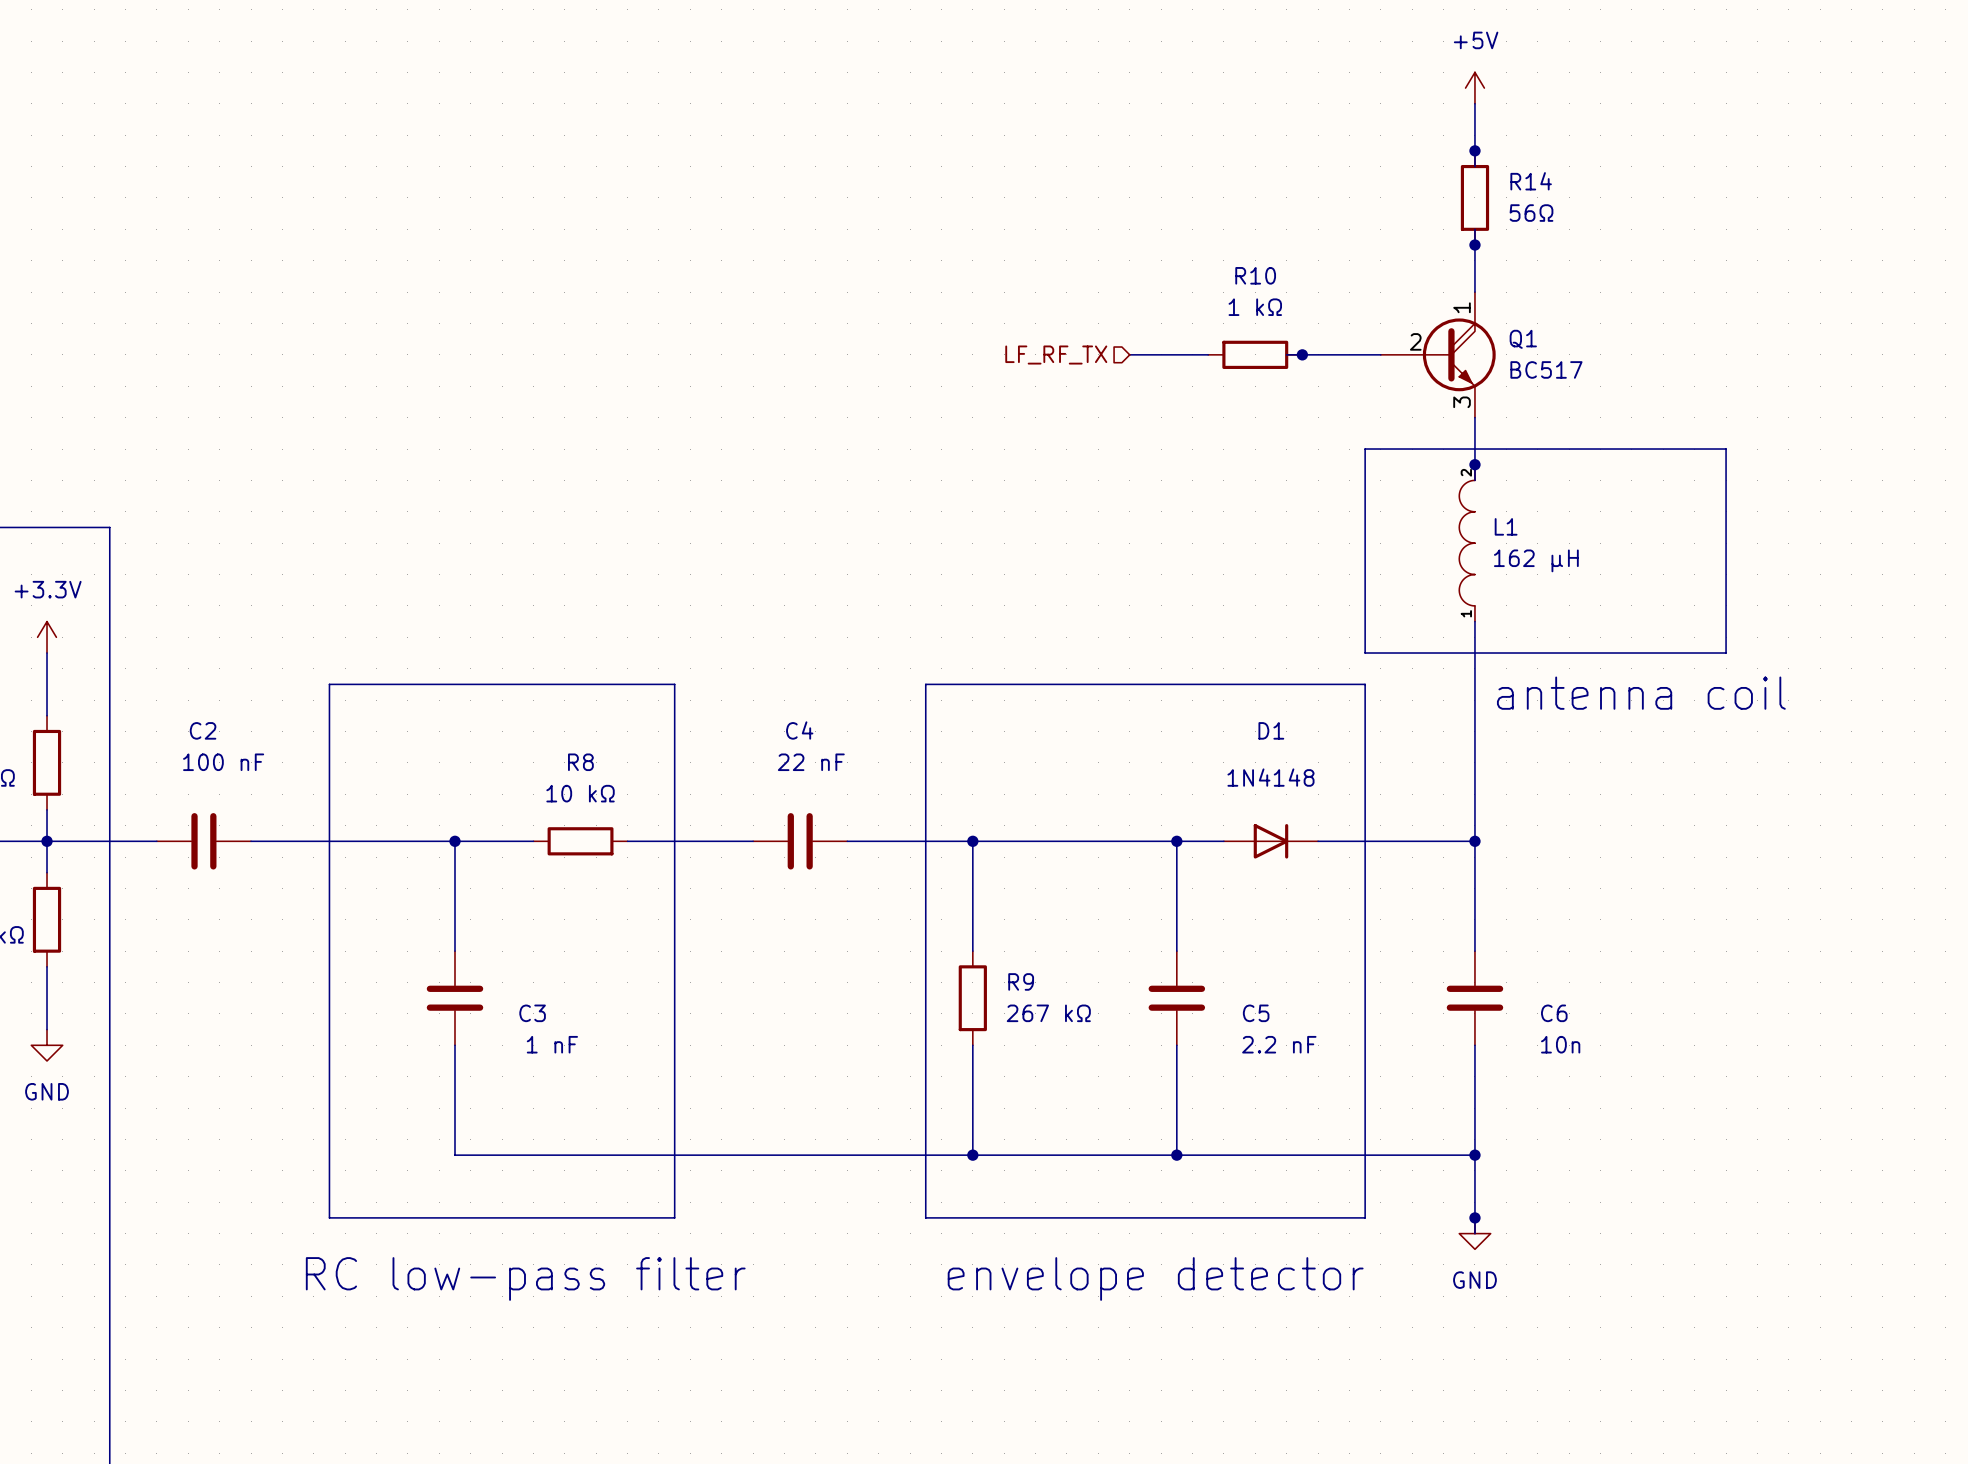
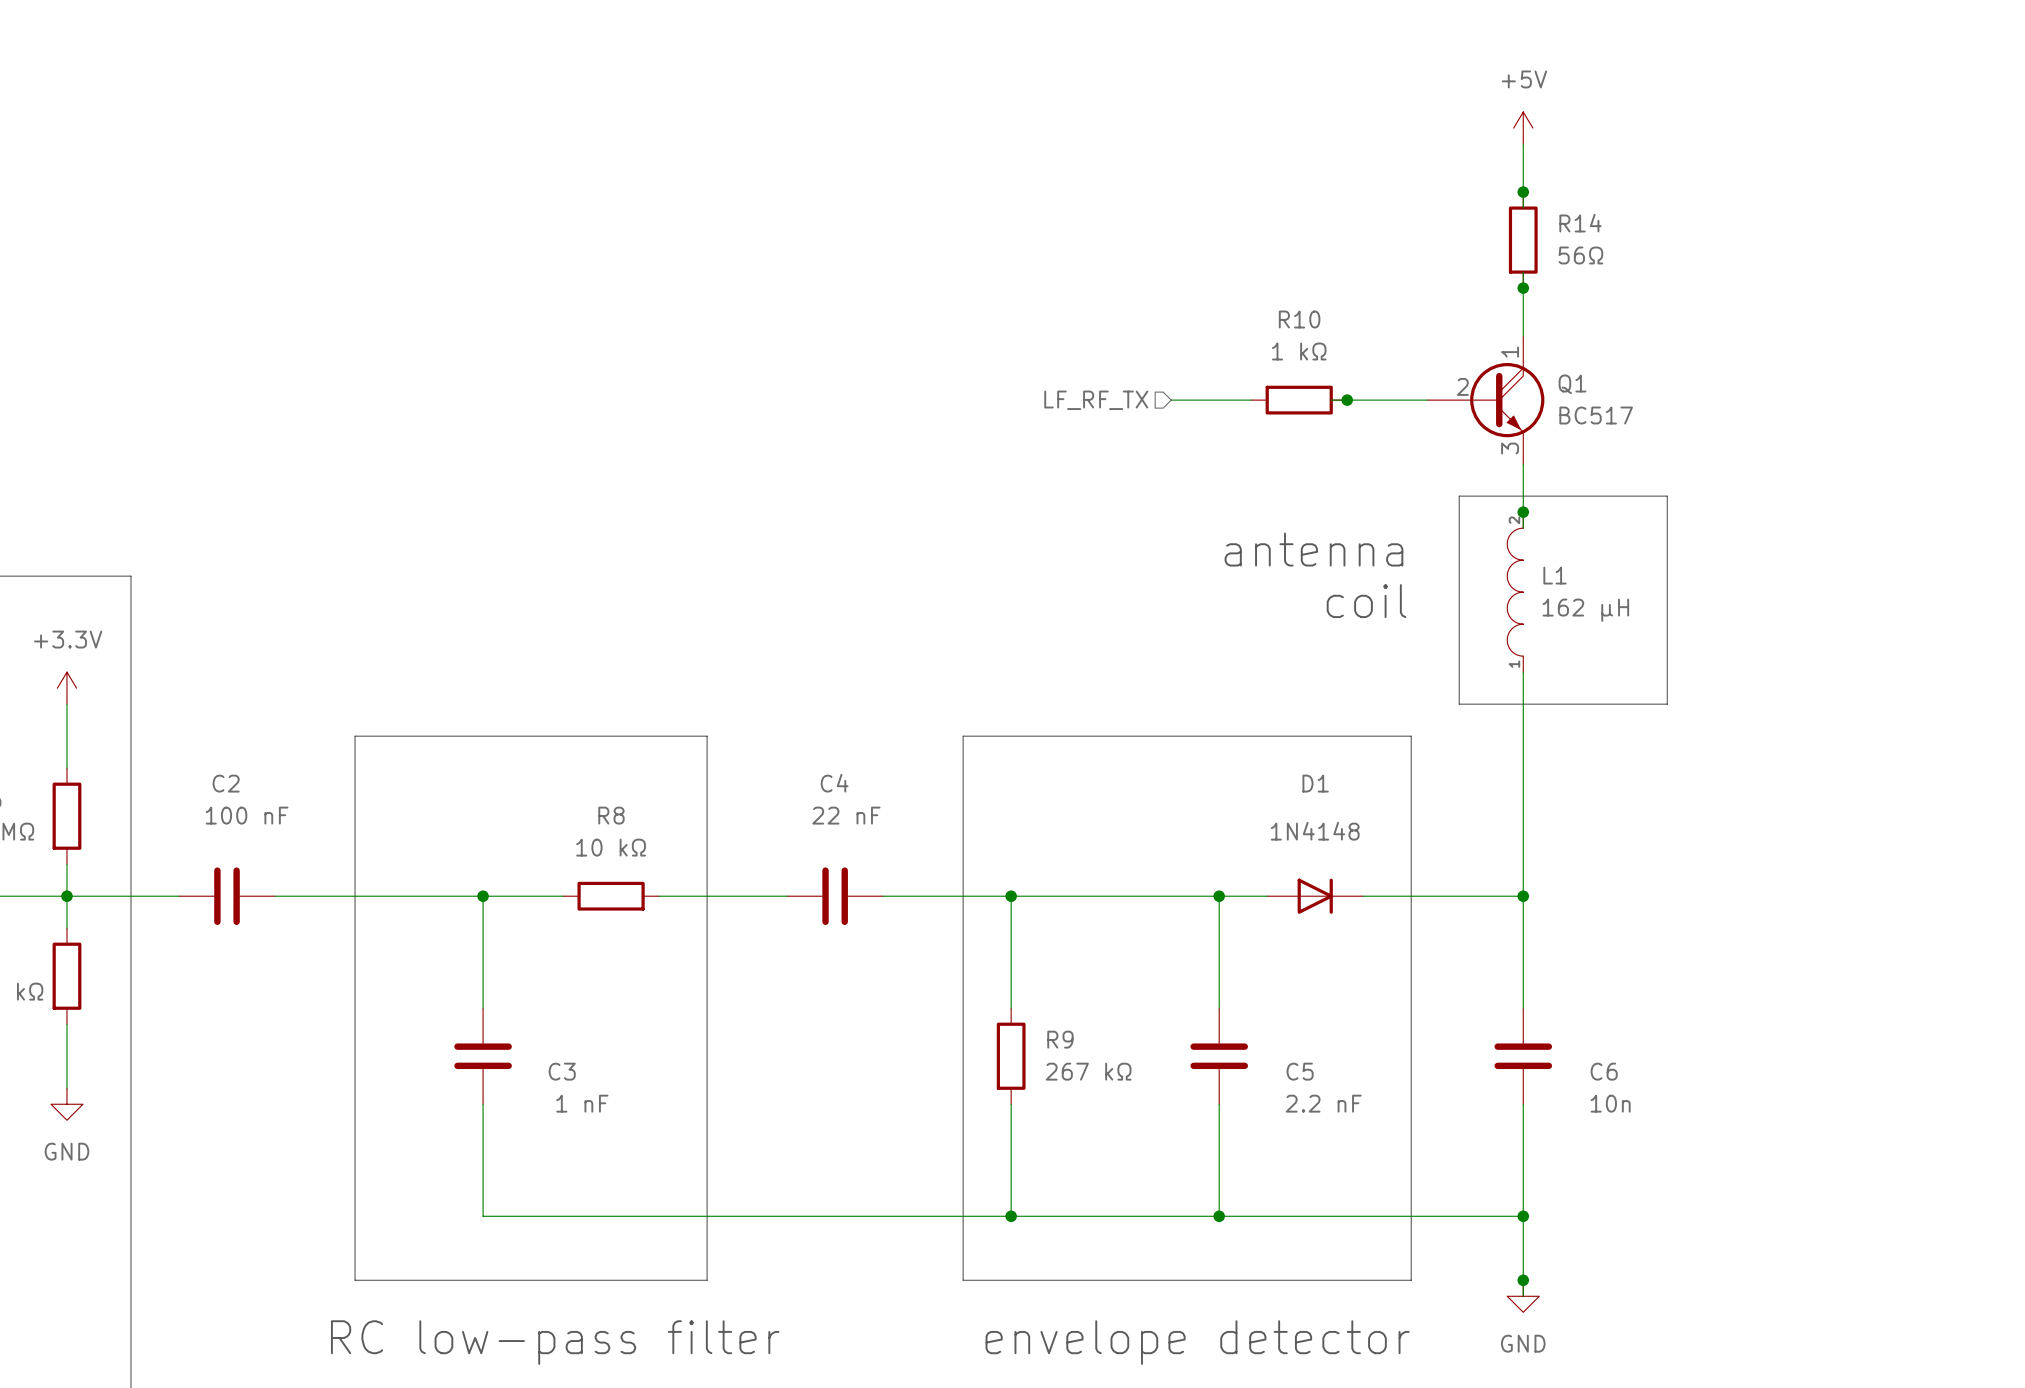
line: (1412, 449) (1365, 449) (1365, 653) (1412, 653) -> (1459, 496) (1459, 704)
line: (1616, 449) (1726, 449) (1726, 653) (1616, 653) -> (1667, 496) (1667, 704)
text: none -> antenna (1313, 549)
text: none -> coil (1366, 601)
text: antenna coil (1641, 693) -> none

